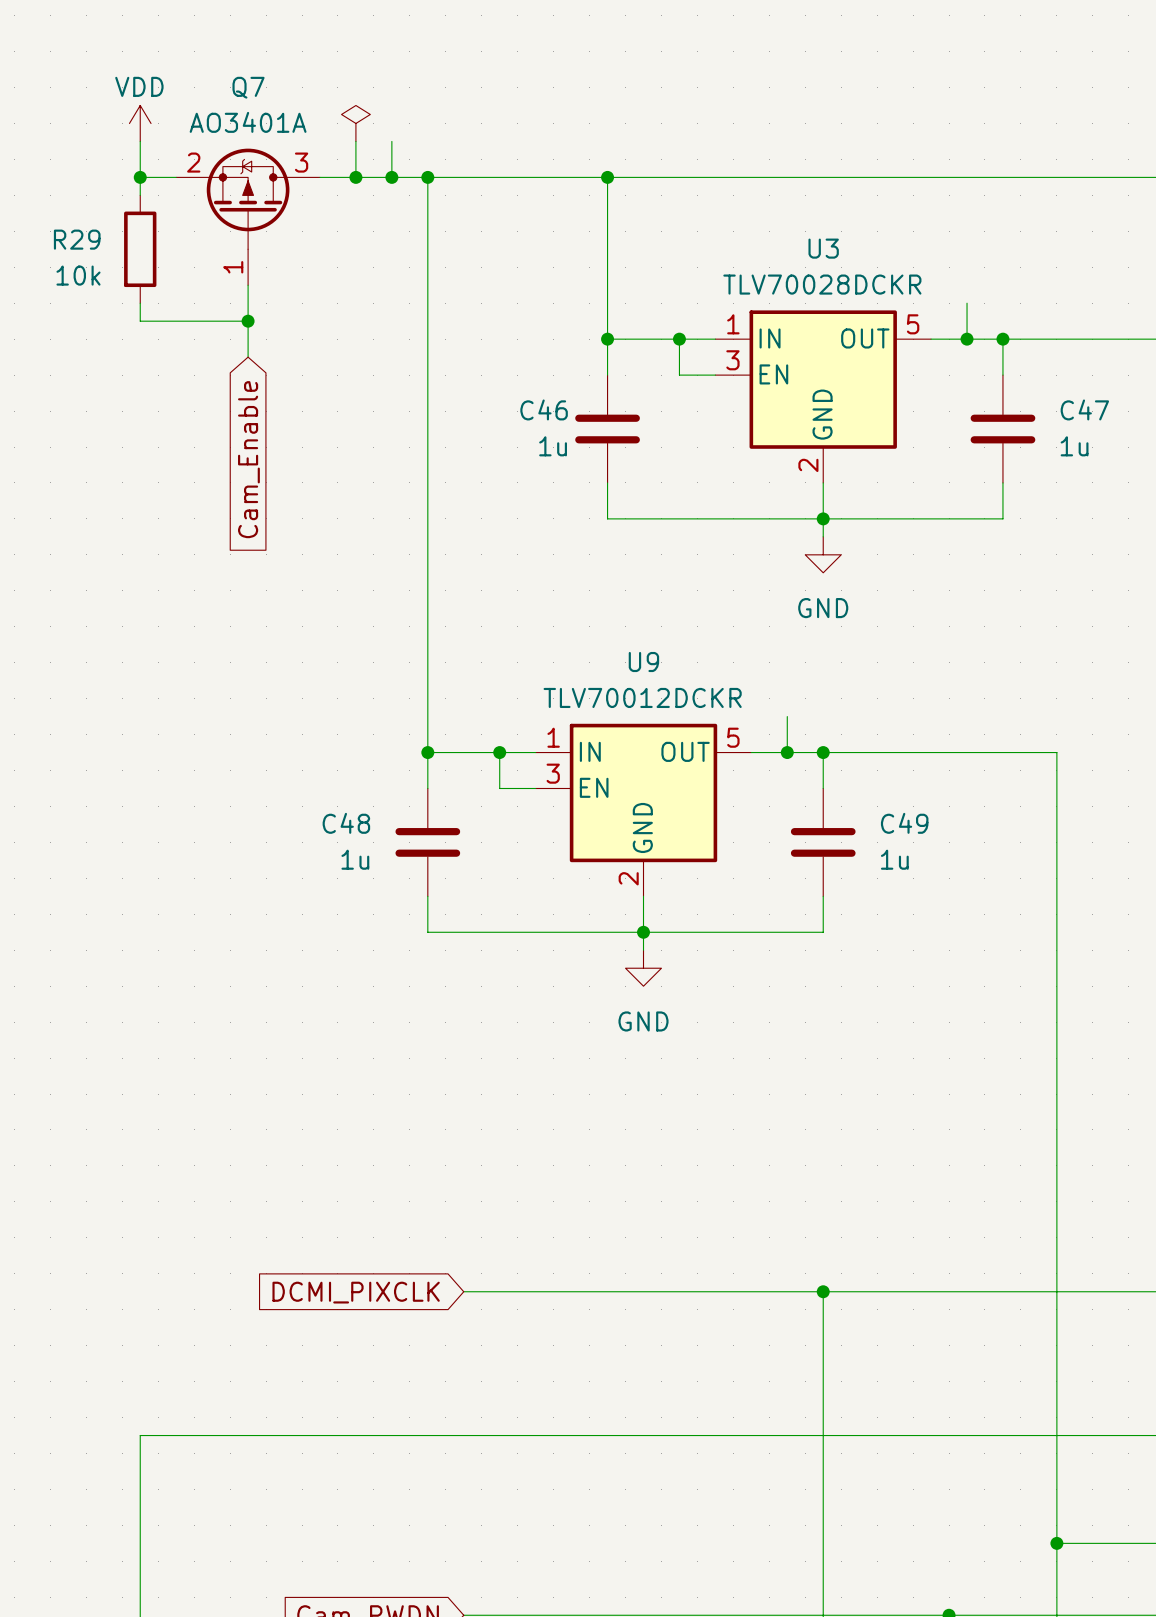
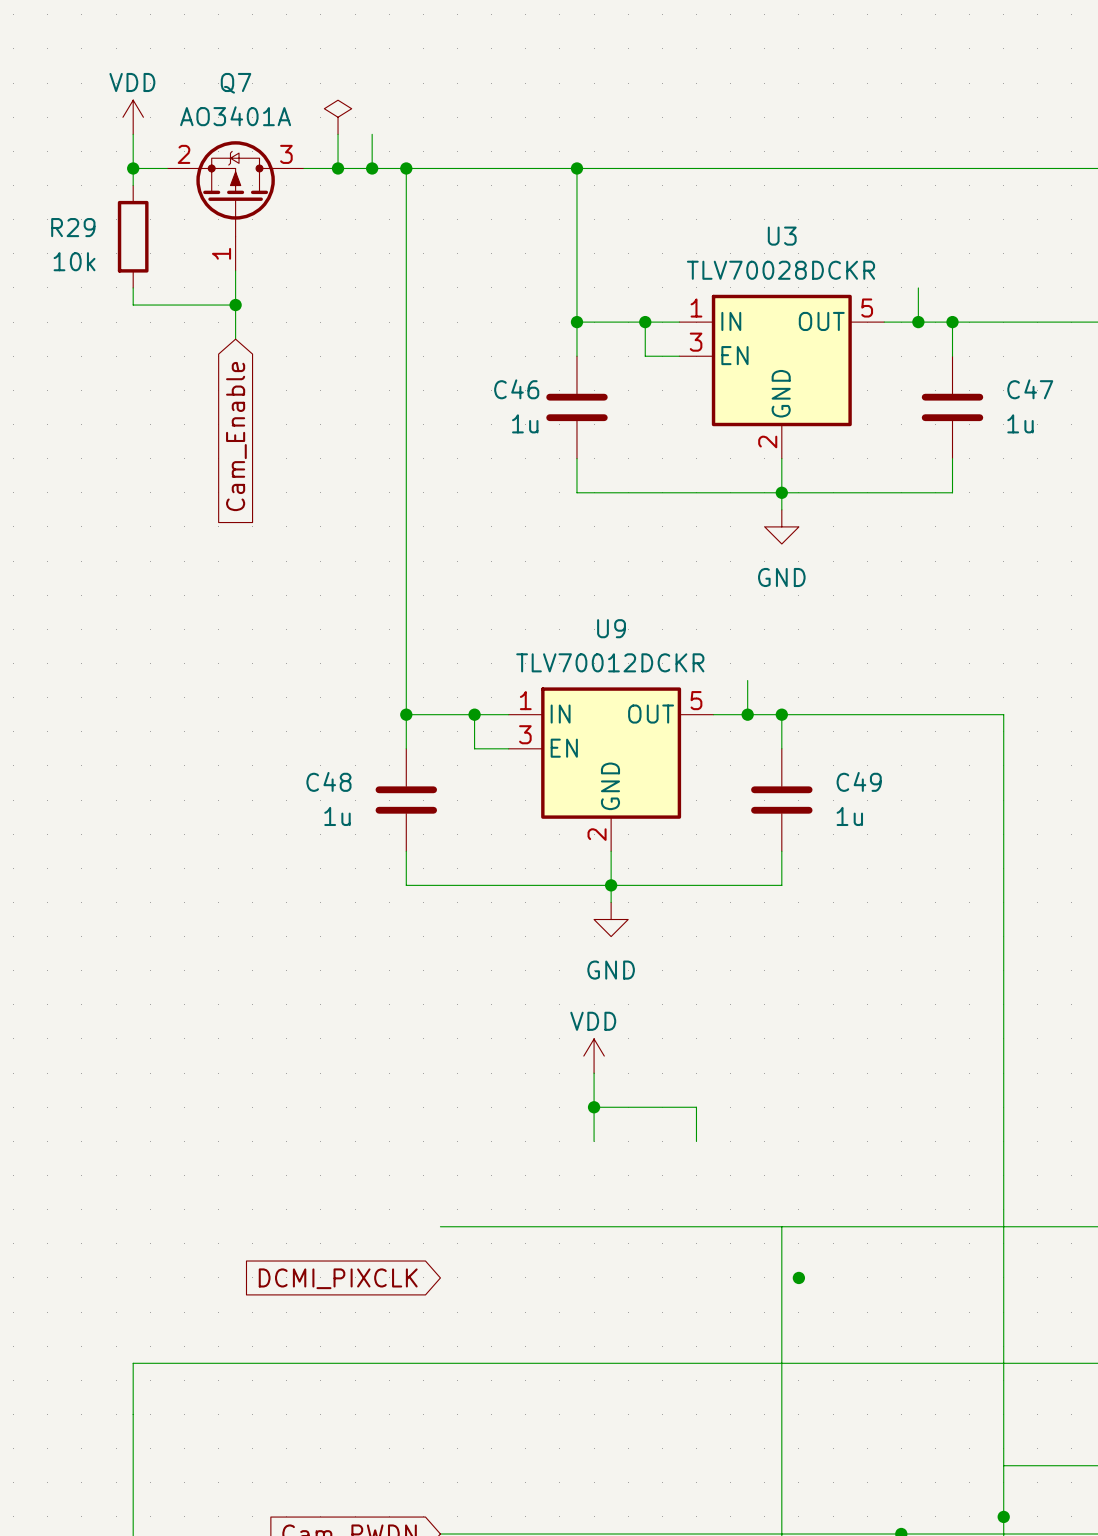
power symbol: none -> VDD (594, 1056)
wire: none -> (594, 1073) (594, 1141)
wire: none -> (594, 1107) (696, 1107) (696, 1141)
junction: none -> (594, 1107)
junction position: (823, 1291) -> (798, 1277)
global label position: DCMI_PIXCLK (356, 1292) -> DCMI_PIXCLK (338, 1278)
junction position: (1056, 1543) -> (1003, 1516)

